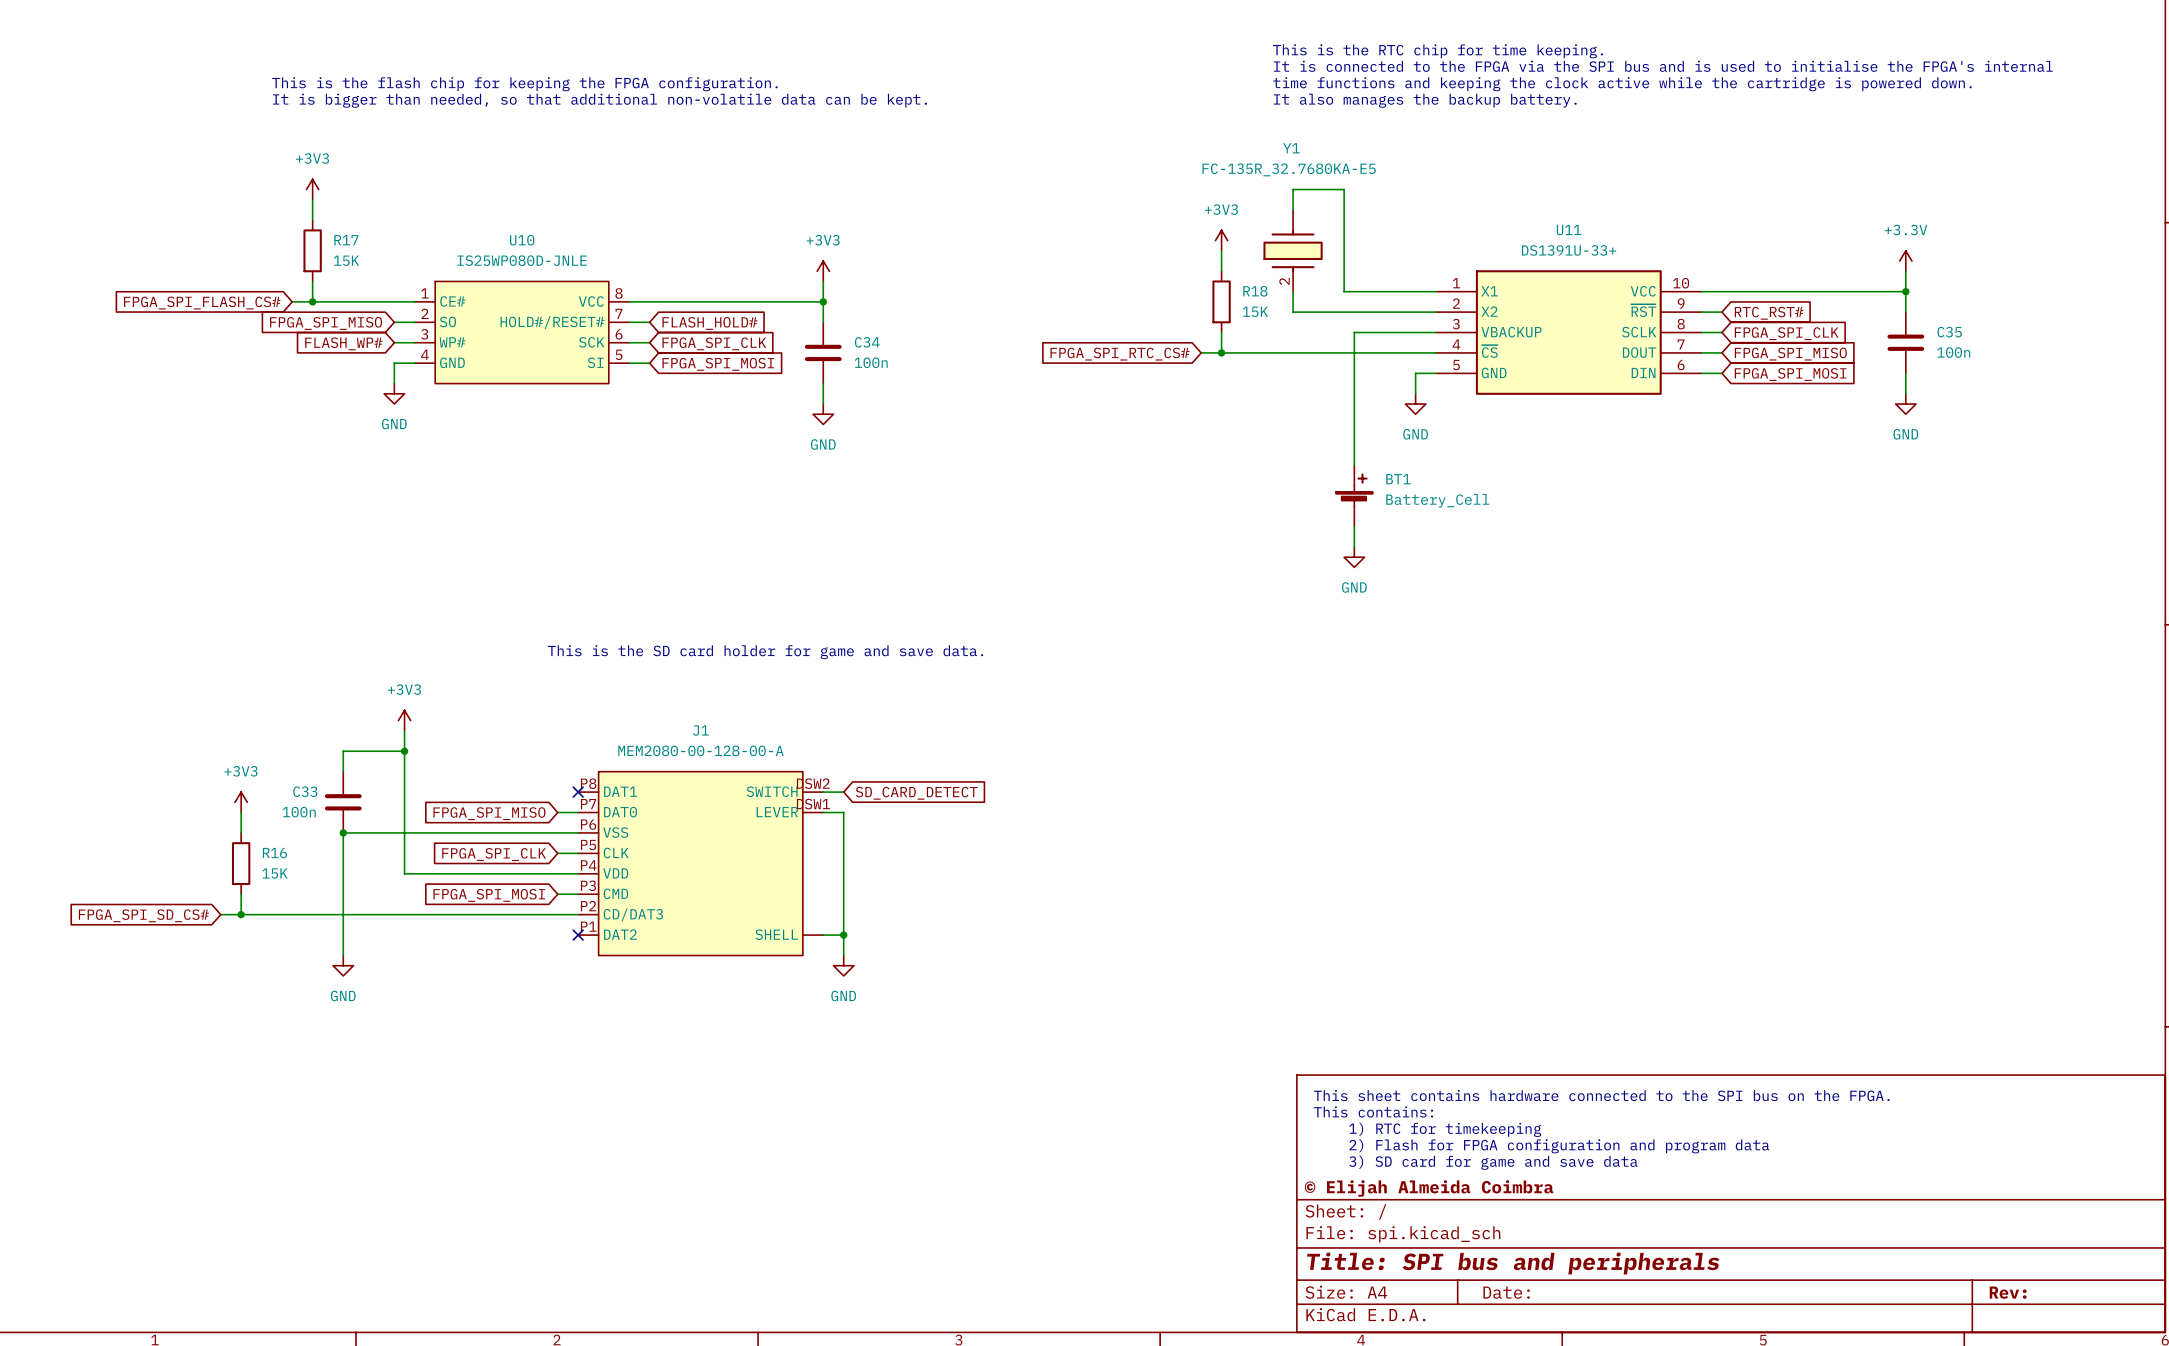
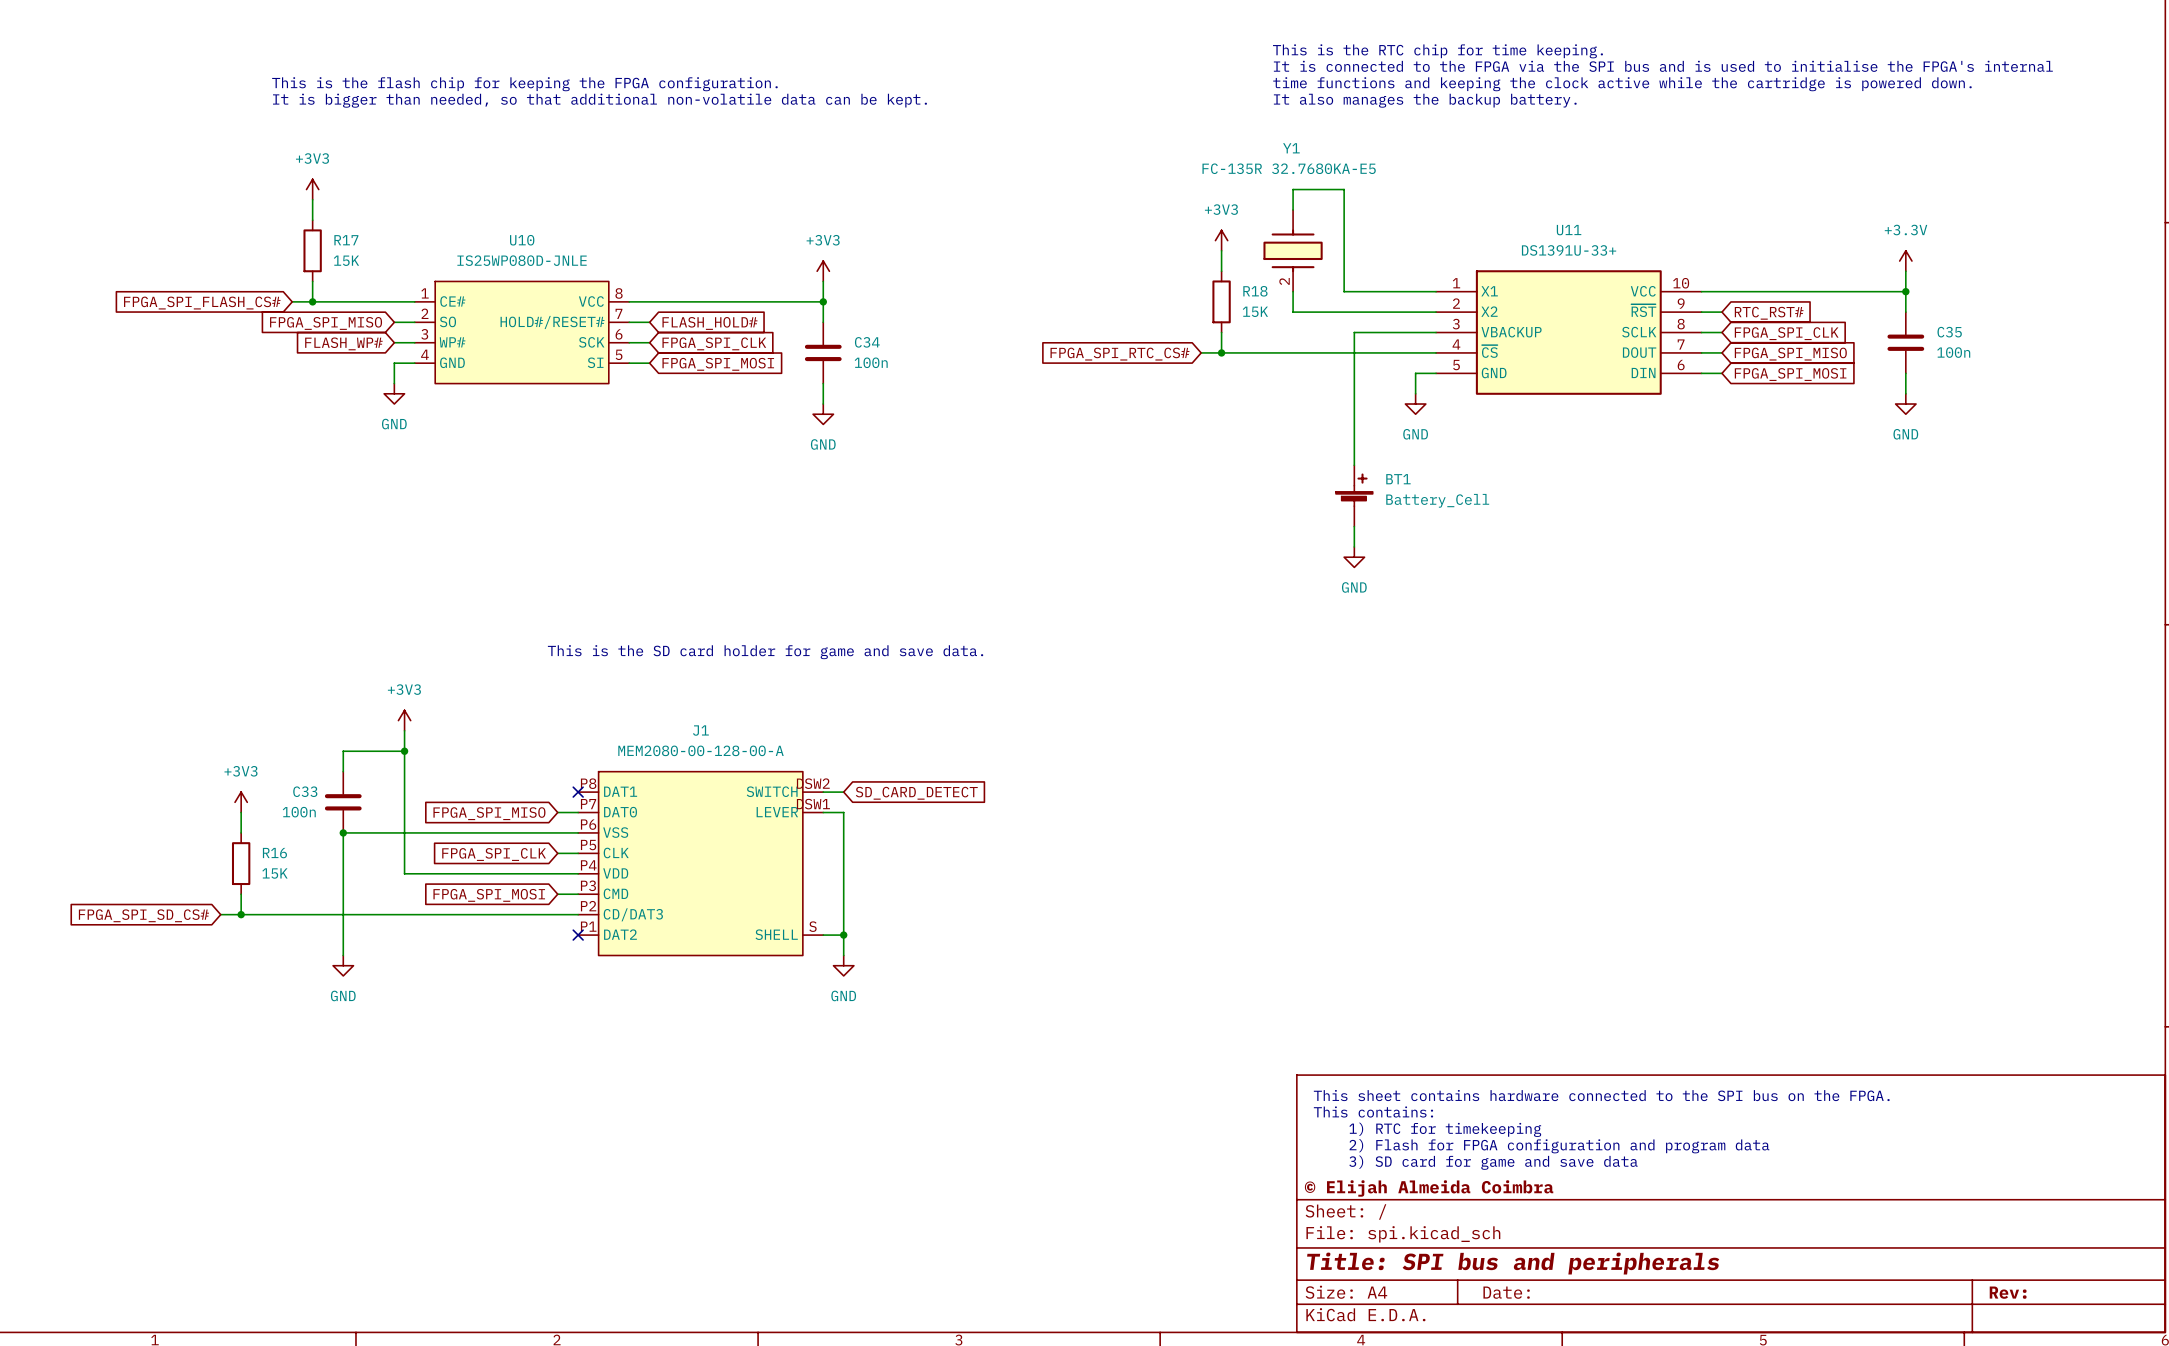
Y1 value: FC-135R_32.7680KA-E5 (1289, 169) -> FC-135R 32.7680KA-E5 (1289, 168)
J1 pin number: none -> S (812, 926)

